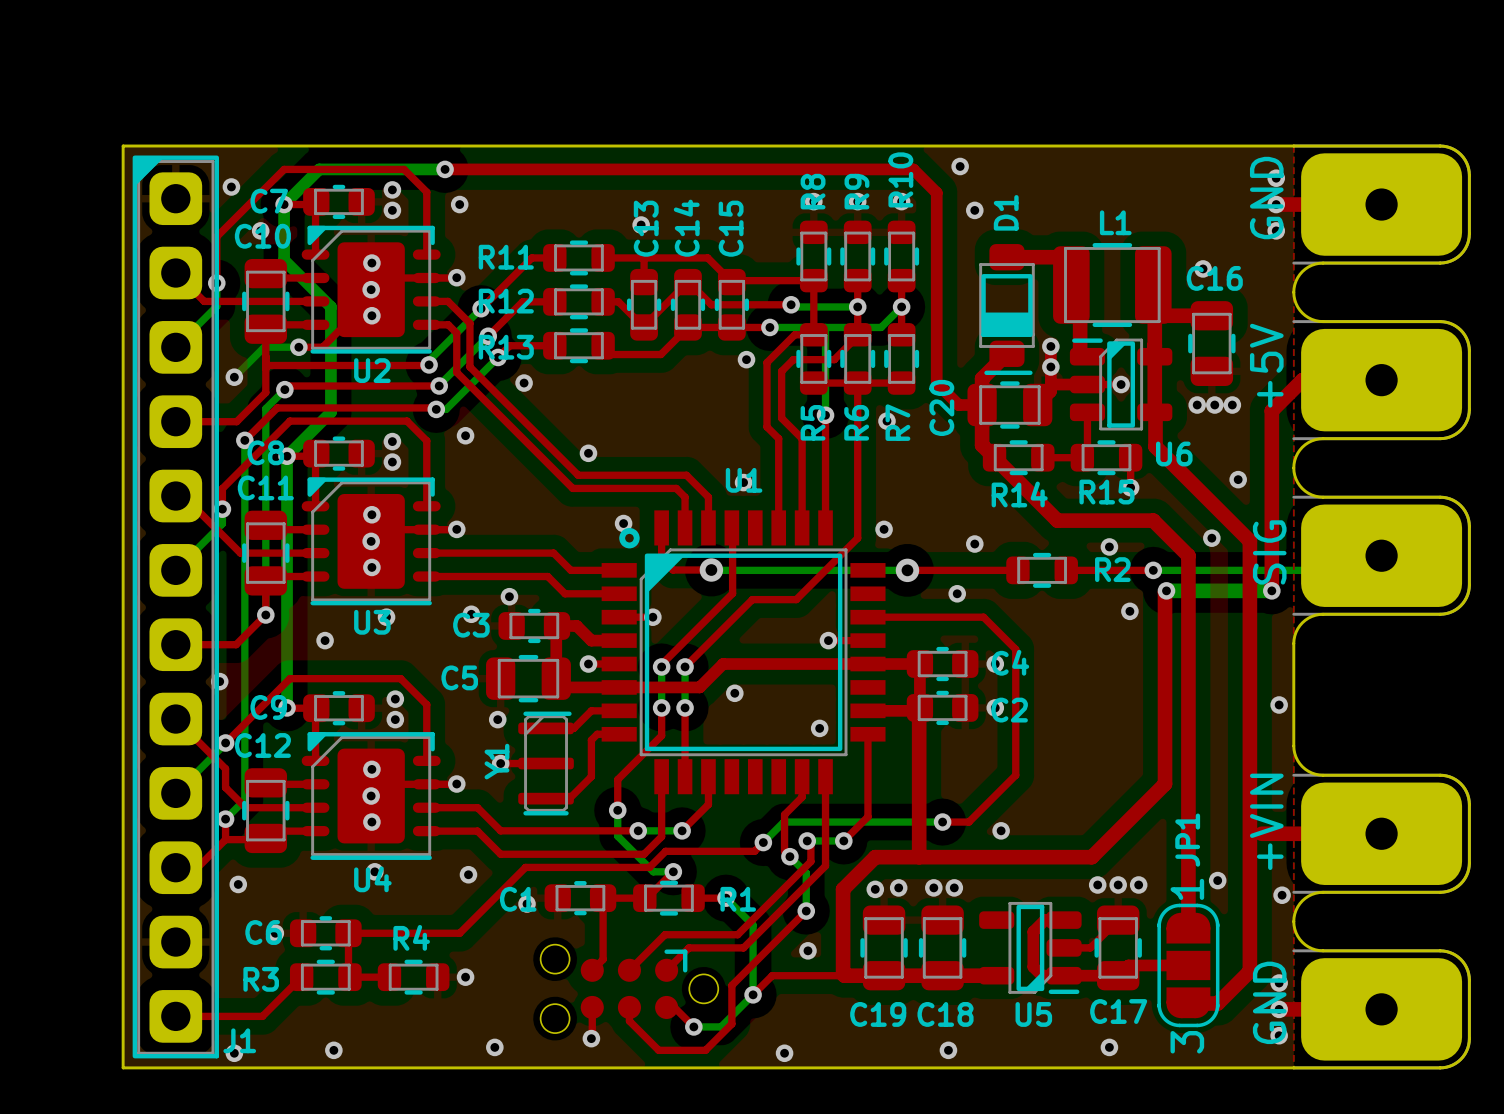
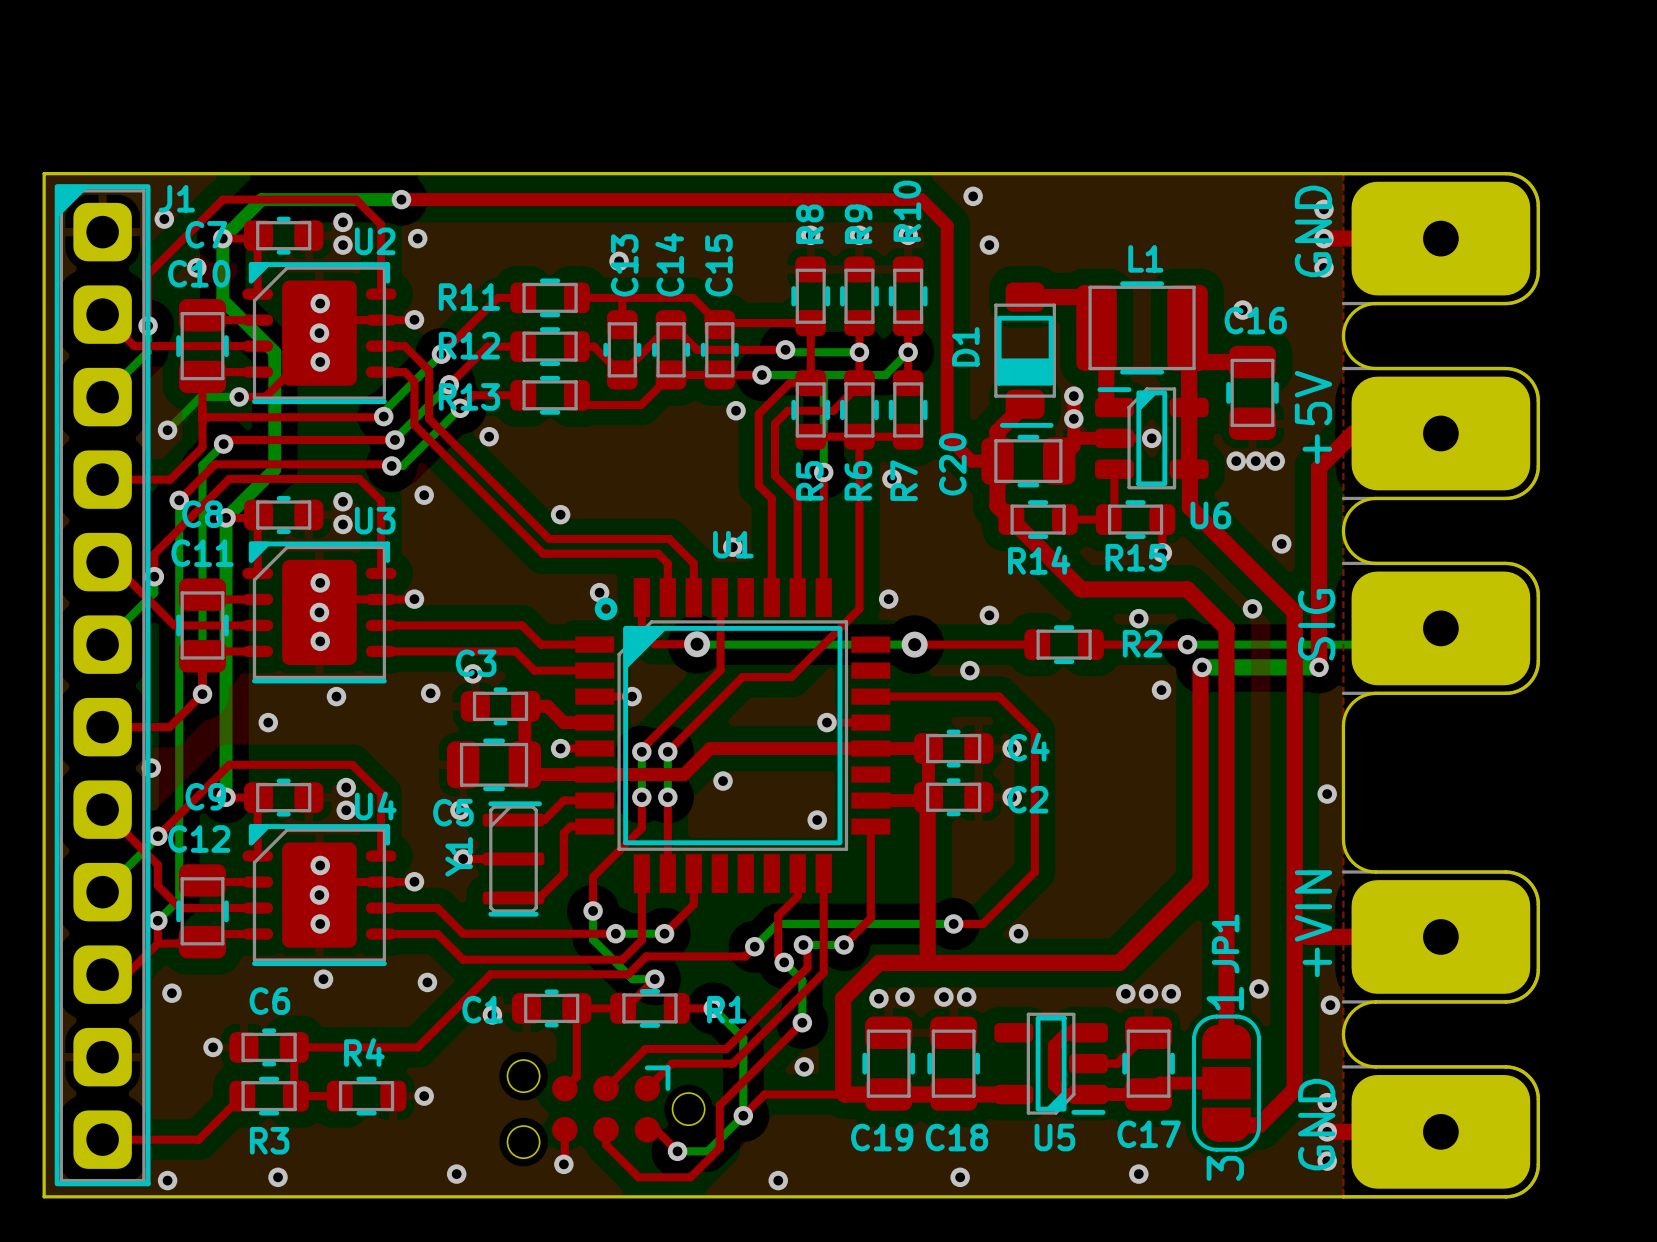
D1 name position: D1 (1006, 212) -> D1 (965, 346)
U2 name position: U2 (372, 370) -> U2 (375, 241)
U3 name position: U3 (372, 622) -> U3 (375, 520)
C3 name position: C3 (471, 625) -> C3 (476, 663)
C5 name position: C5 (459, 677) -> C5 (453, 812)
U4 name position: U4 (372, 879) -> U4 (375, 805)
C6 name position: C6 (263, 932) -> C6 (269, 1001)
R3 name position: R3 (261, 979) -> R3 (269, 1140)
J1 name position: J1 (239, 1040) -> J1 (176, 198)

